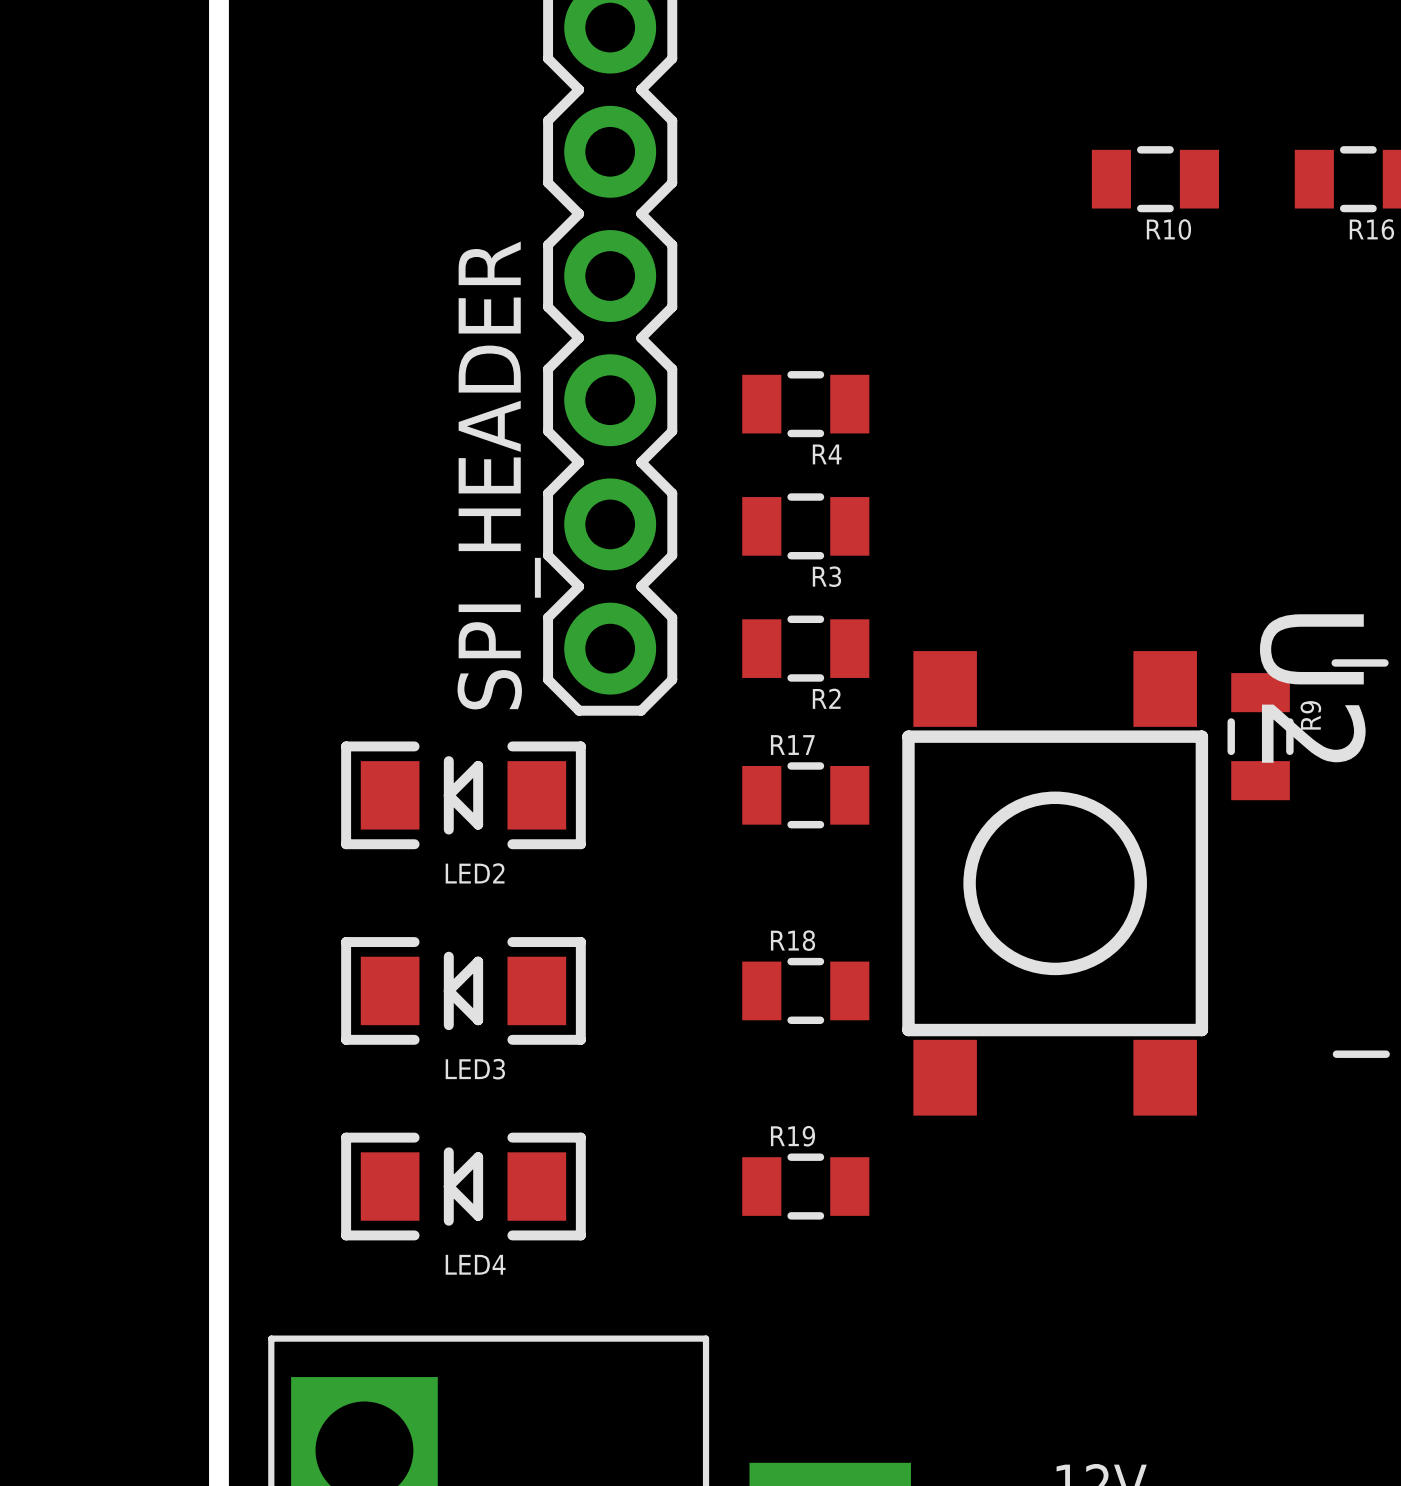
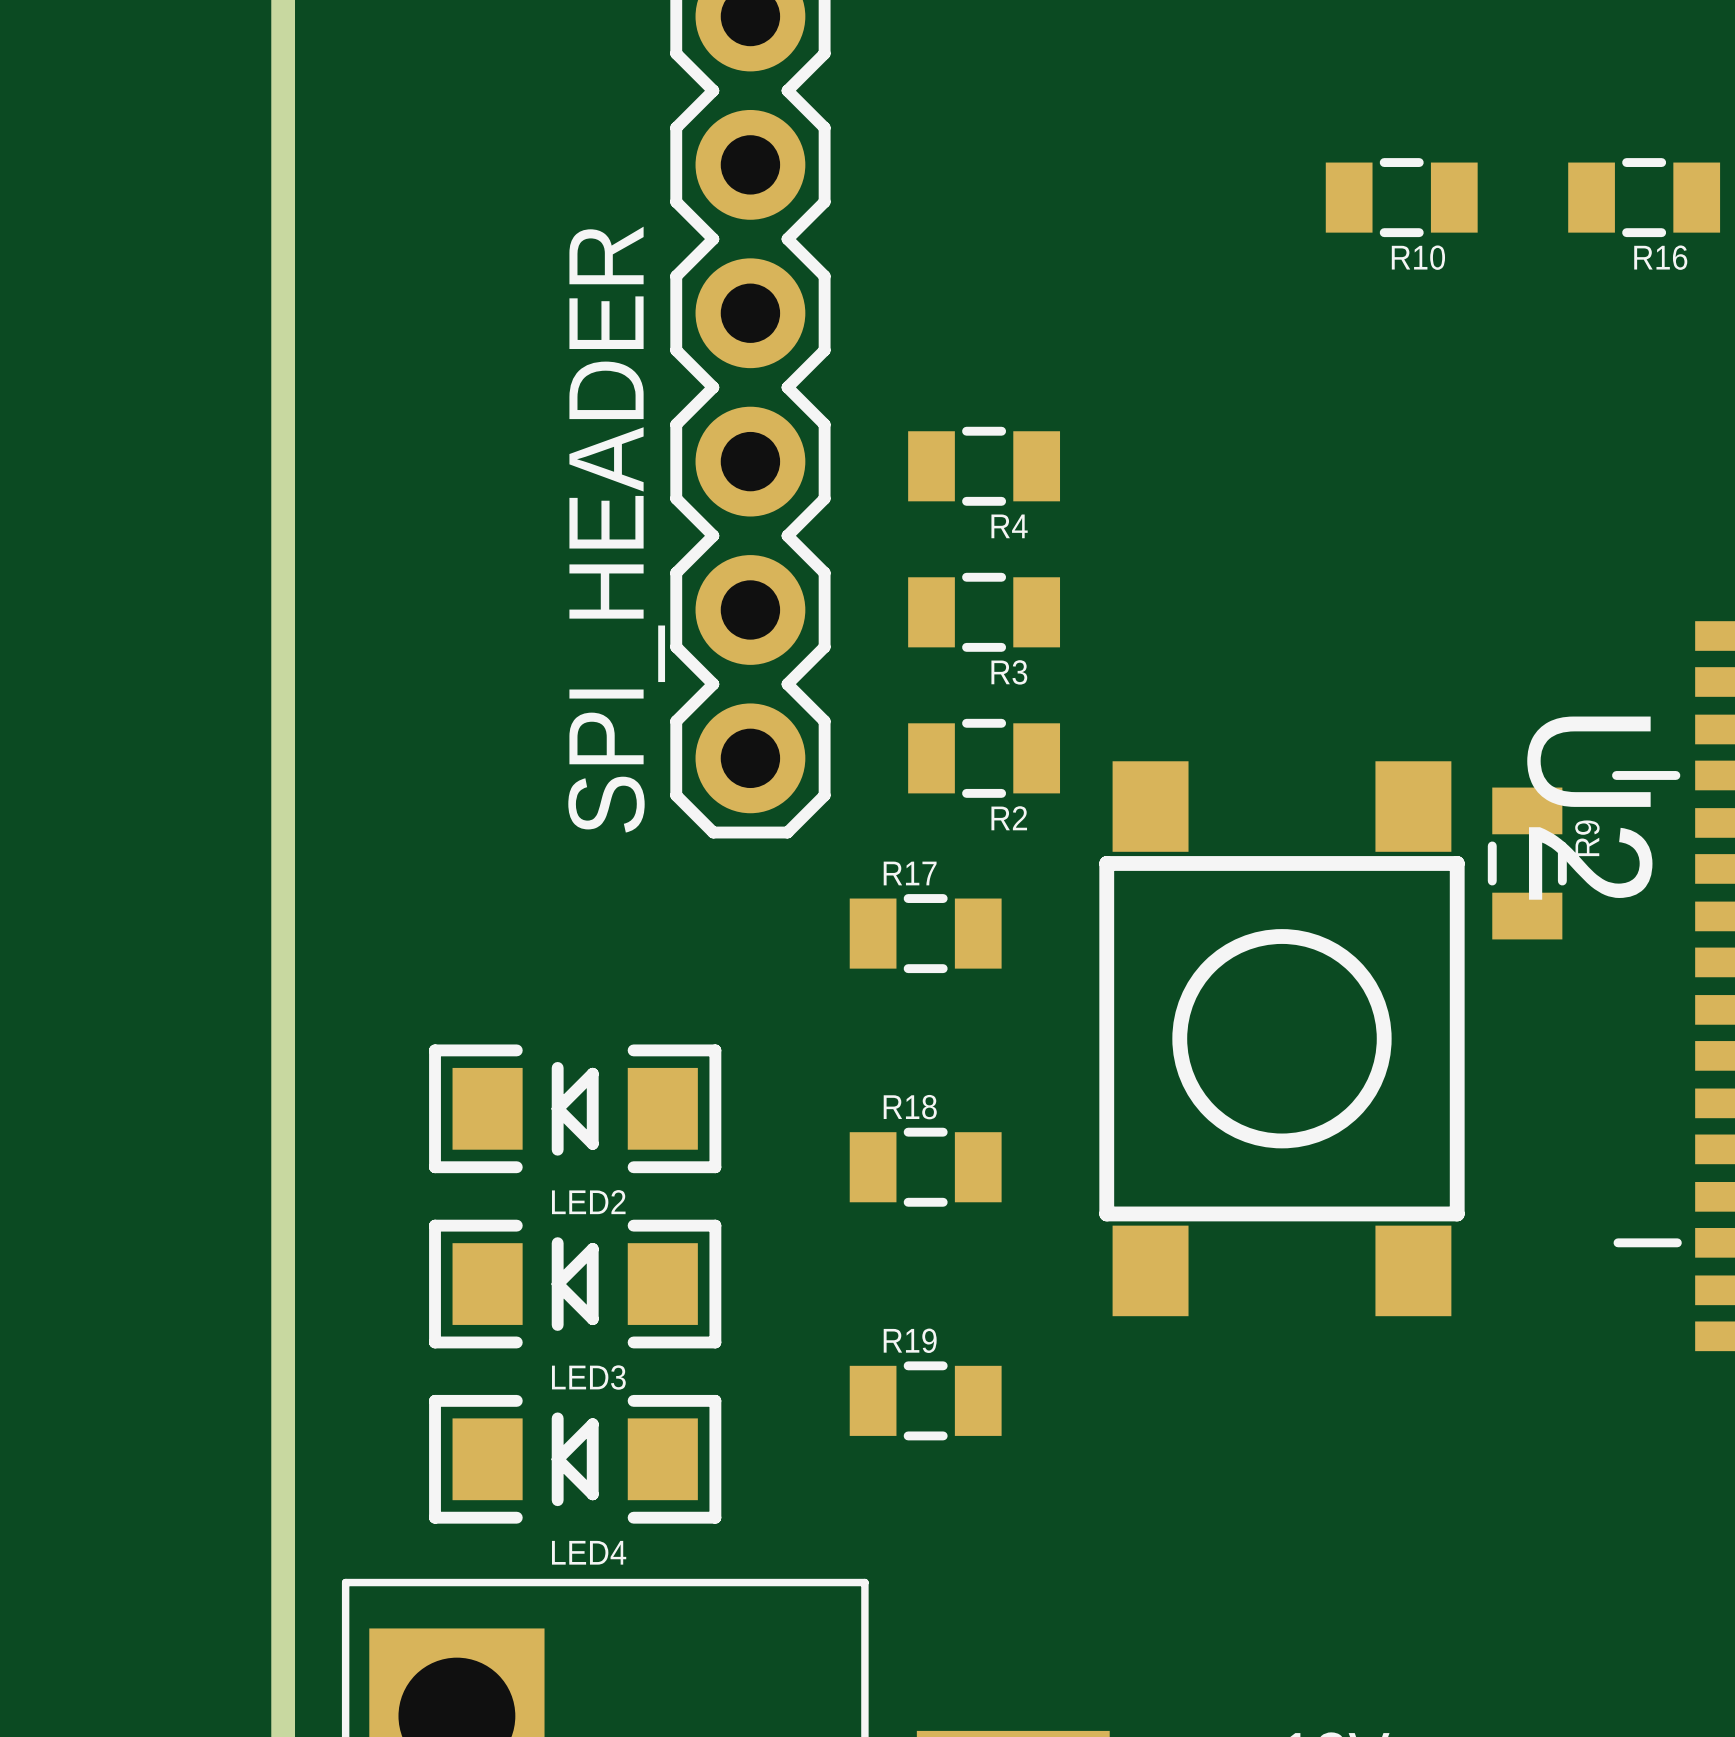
LED2 position: (463, 795) -> (575, 1108)
R17 position: (805, 795) -> (925, 933)
LED3 position: (463, 990) -> (575, 1284)
R18 position: (805, 990) -> (925, 1167)
LED4 position: (463, 1186) -> (575, 1459)
R19 position: (805, 1186) -> (925, 1400)

